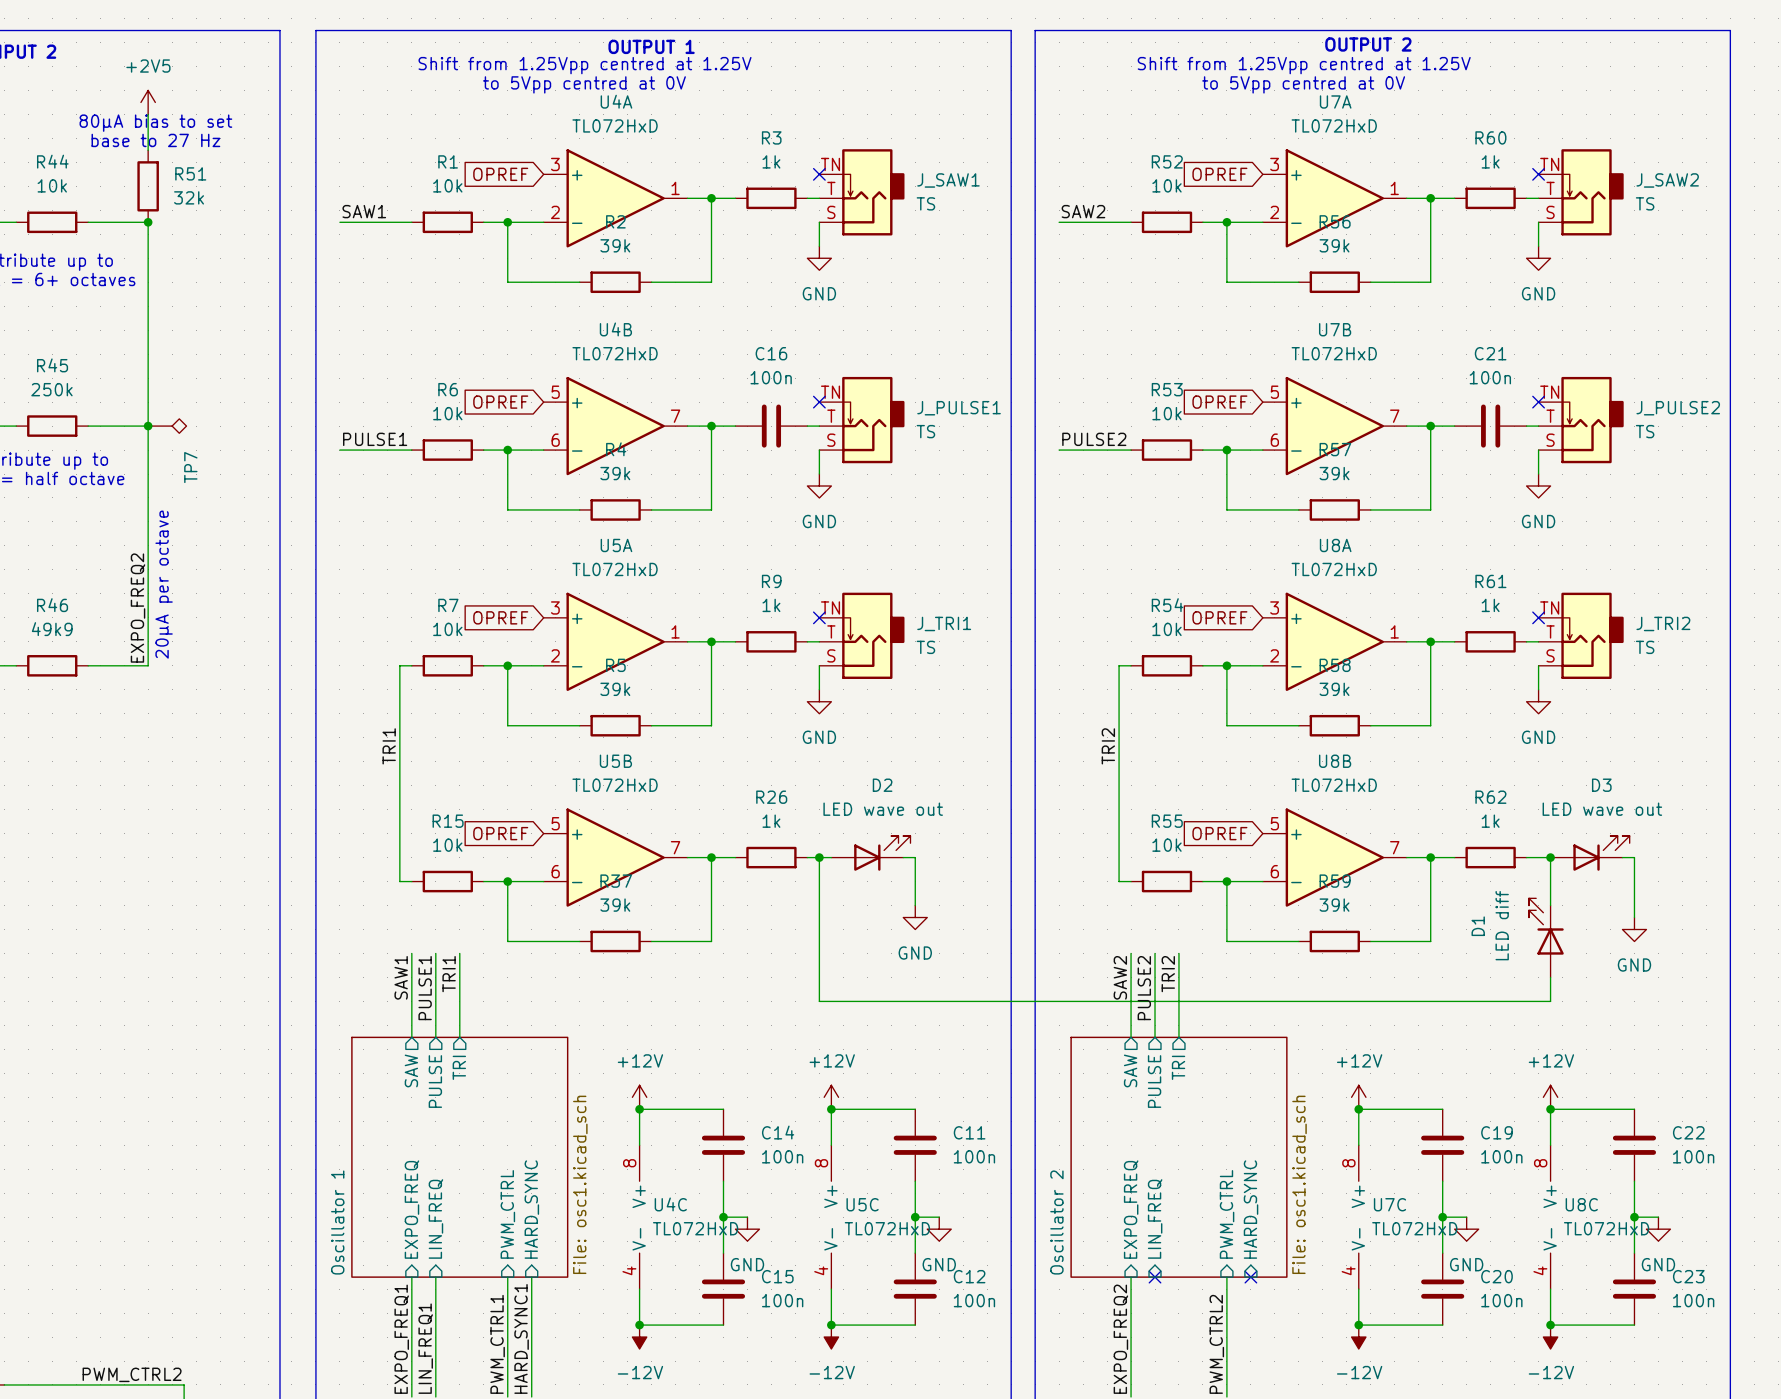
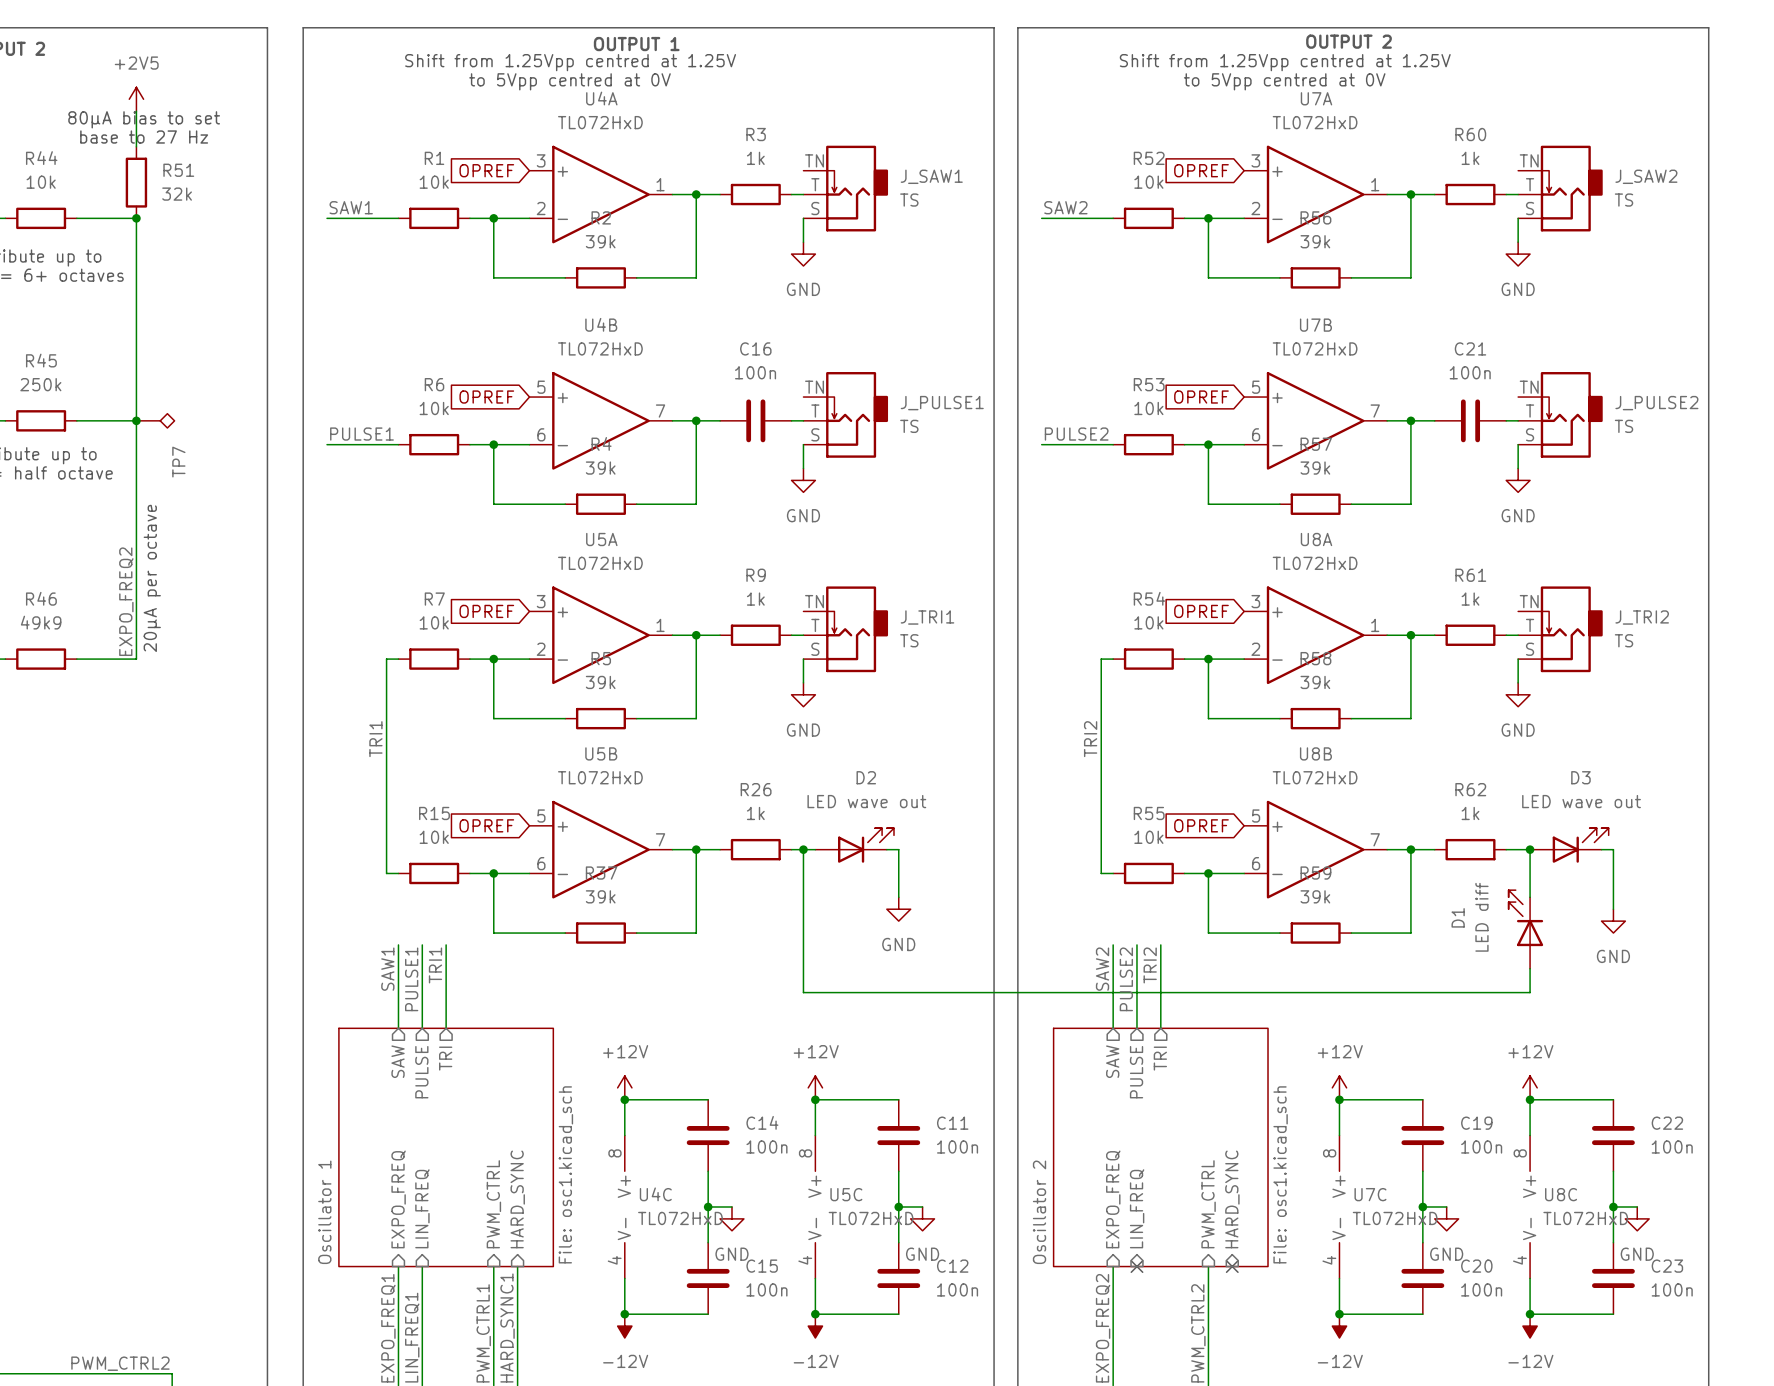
no-connect mark: (819, 174) -> none
no-connect mark: (1538, 174) -> none
no-connect mark: (819, 402) -> none
no-connect mark: (1538, 402) -> none
no-connect mark: (819, 617) -> none
no-connect mark: (1538, 617) -> none

